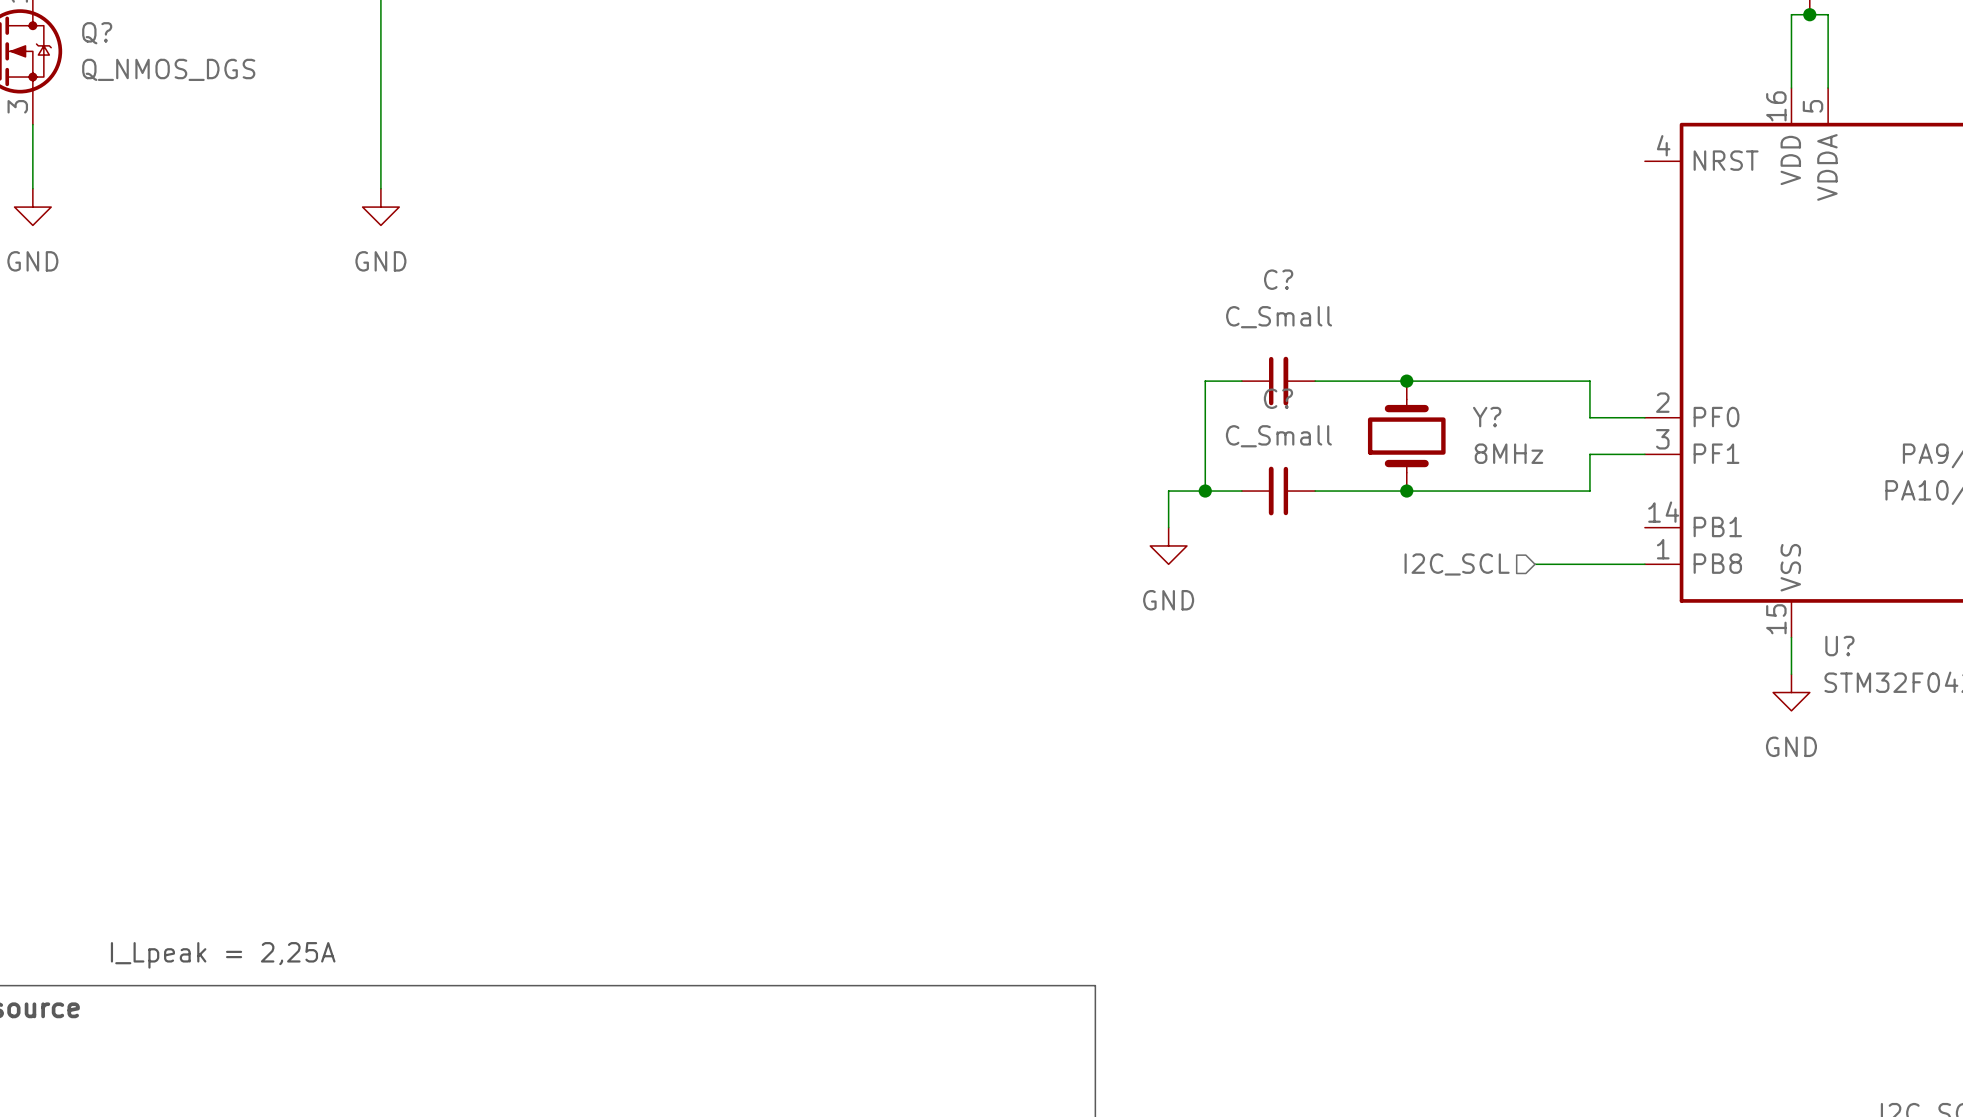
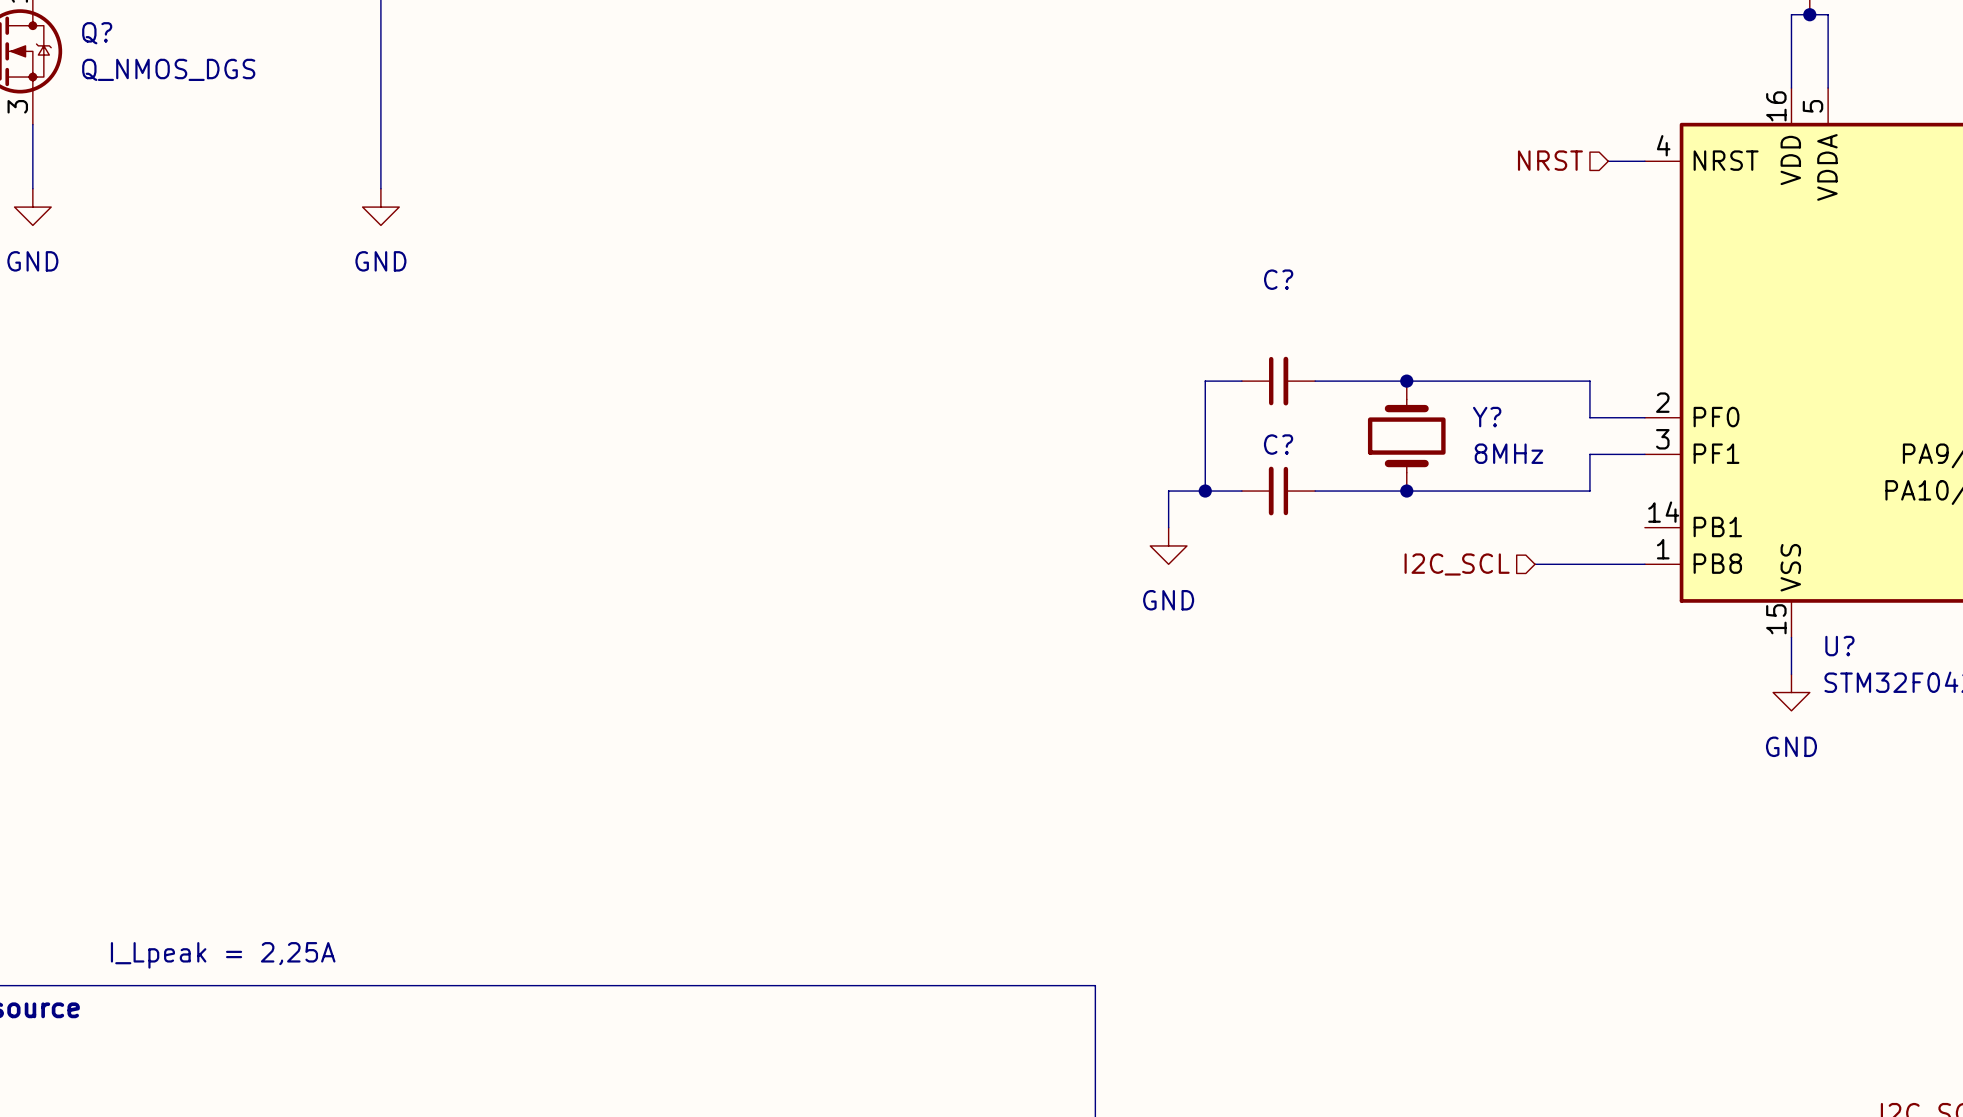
hierarchical label: none -> NRST (1550, 160)
wire: none -> (1608, 161) (1644, 161)
C? value: C_Small (1279, 317) -> none
C? name position: C? (1278, 398) -> C? (1278, 444)
C? value: C_Small (1278, 436) -> none

